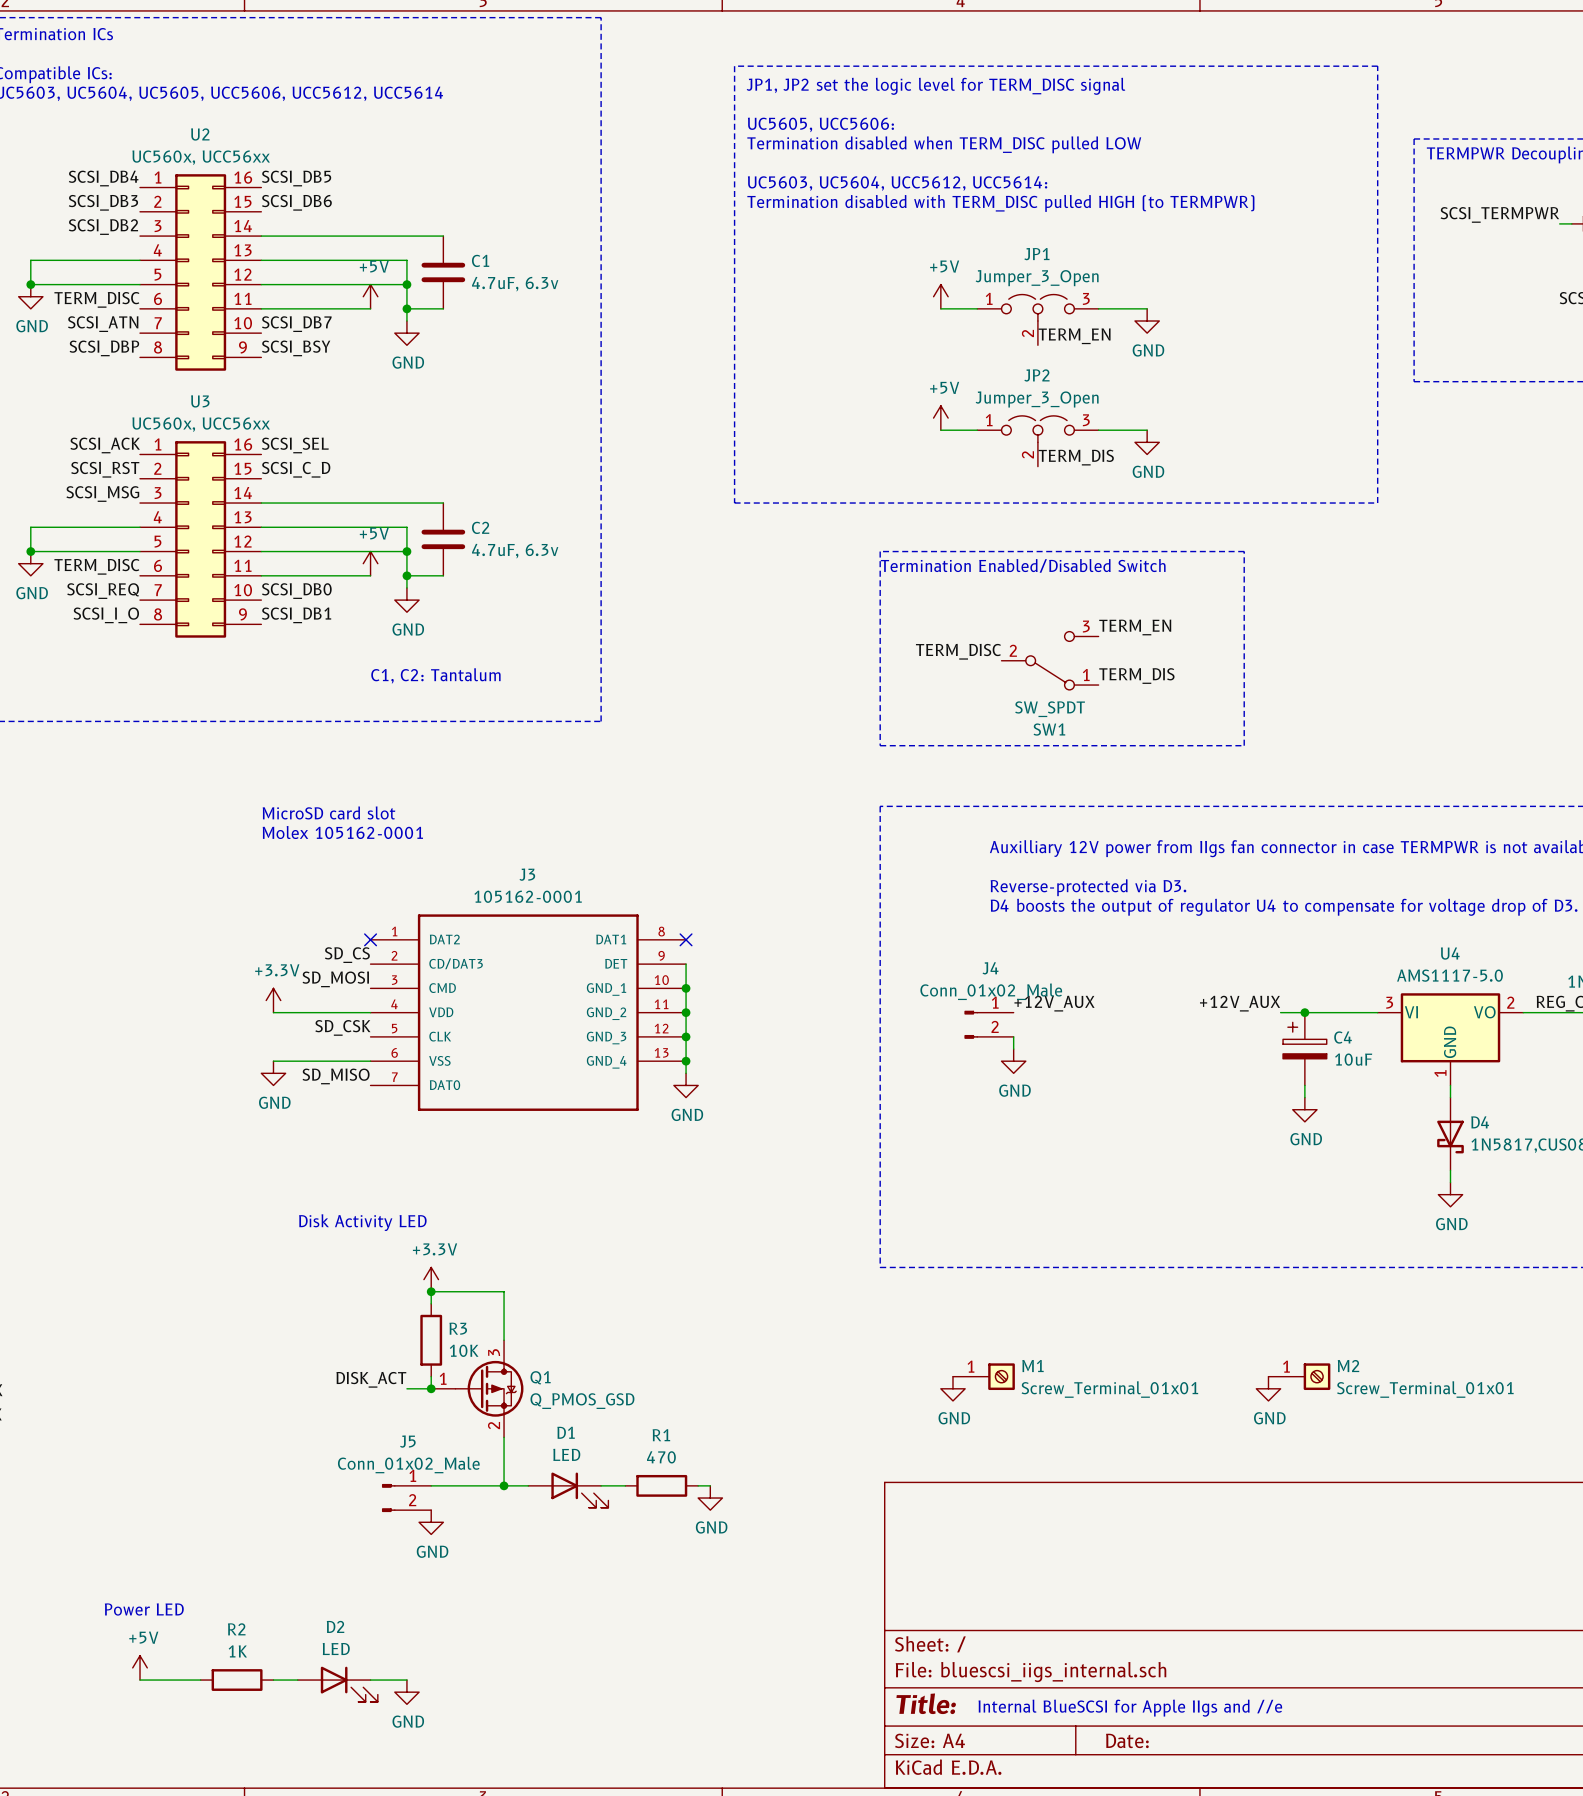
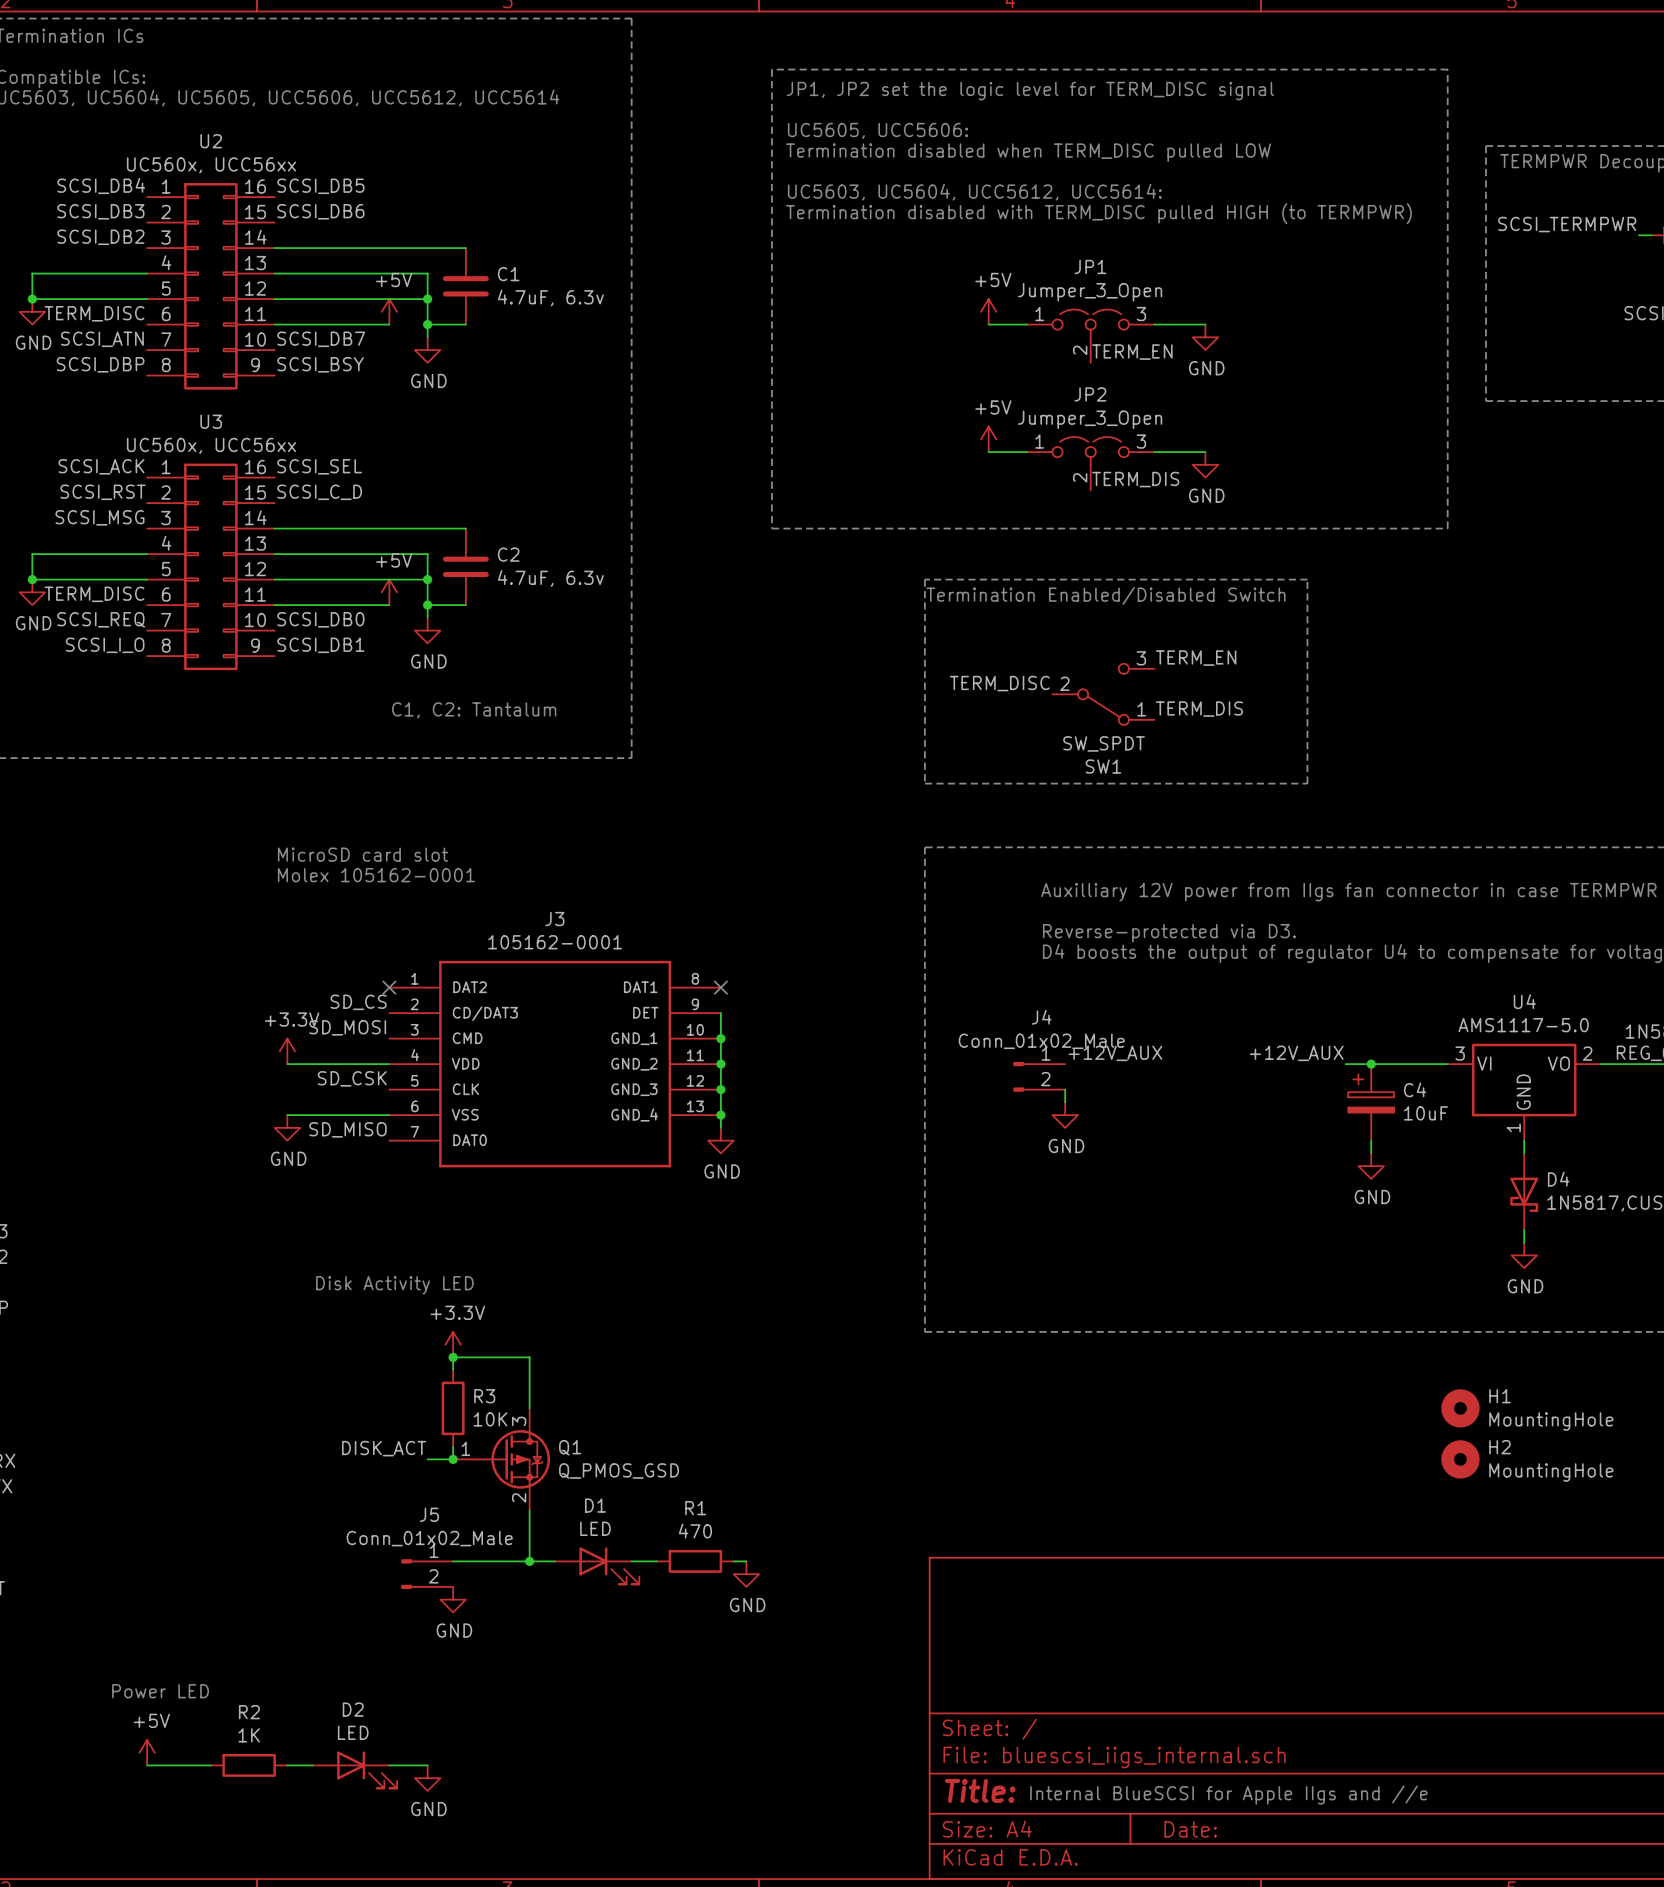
H1: none -> MountingHole (1460, 1408)
M1: Screw_Terminal_01x01 (983, 1376) -> none
M2: Screw_Terminal_01x01 (1299, 1376) -> none
power symbol: GND (952, 1388) -> none
power symbol: GND (1268, 1388) -> none
H2: none -> MountingHole (1460, 1459)

